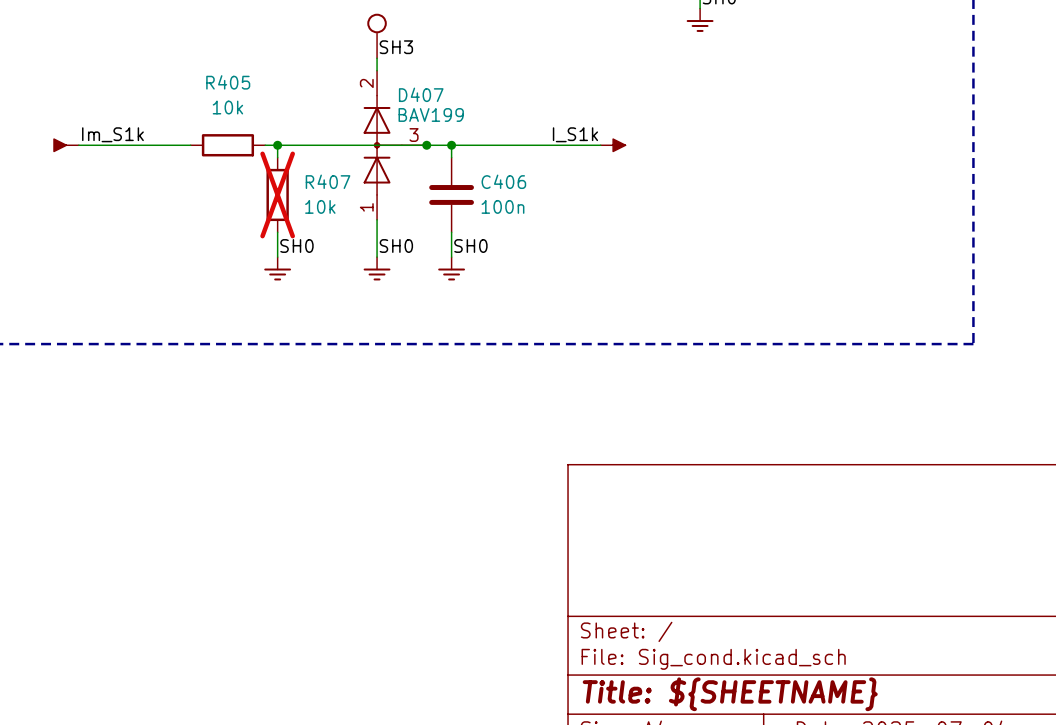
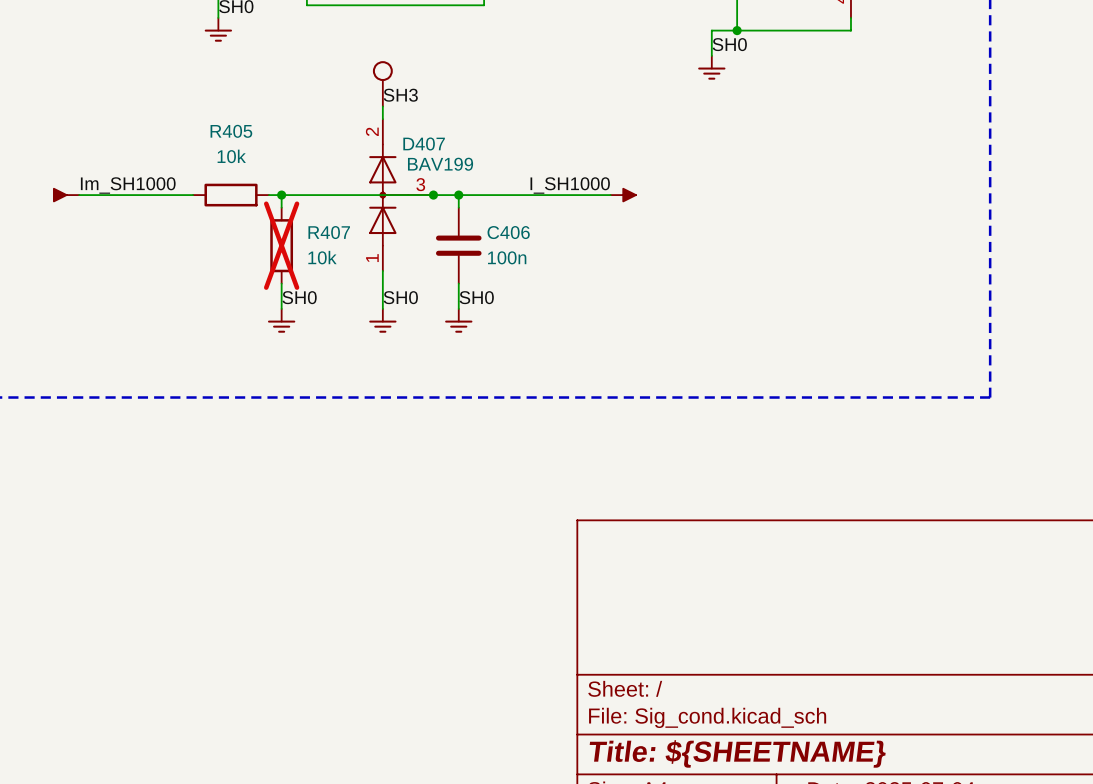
label: Im_S1k (112, 134) -> Im_SH1000 (128, 185)
label: I_S1k (575, 134) -> I_SH1000 (570, 185)

